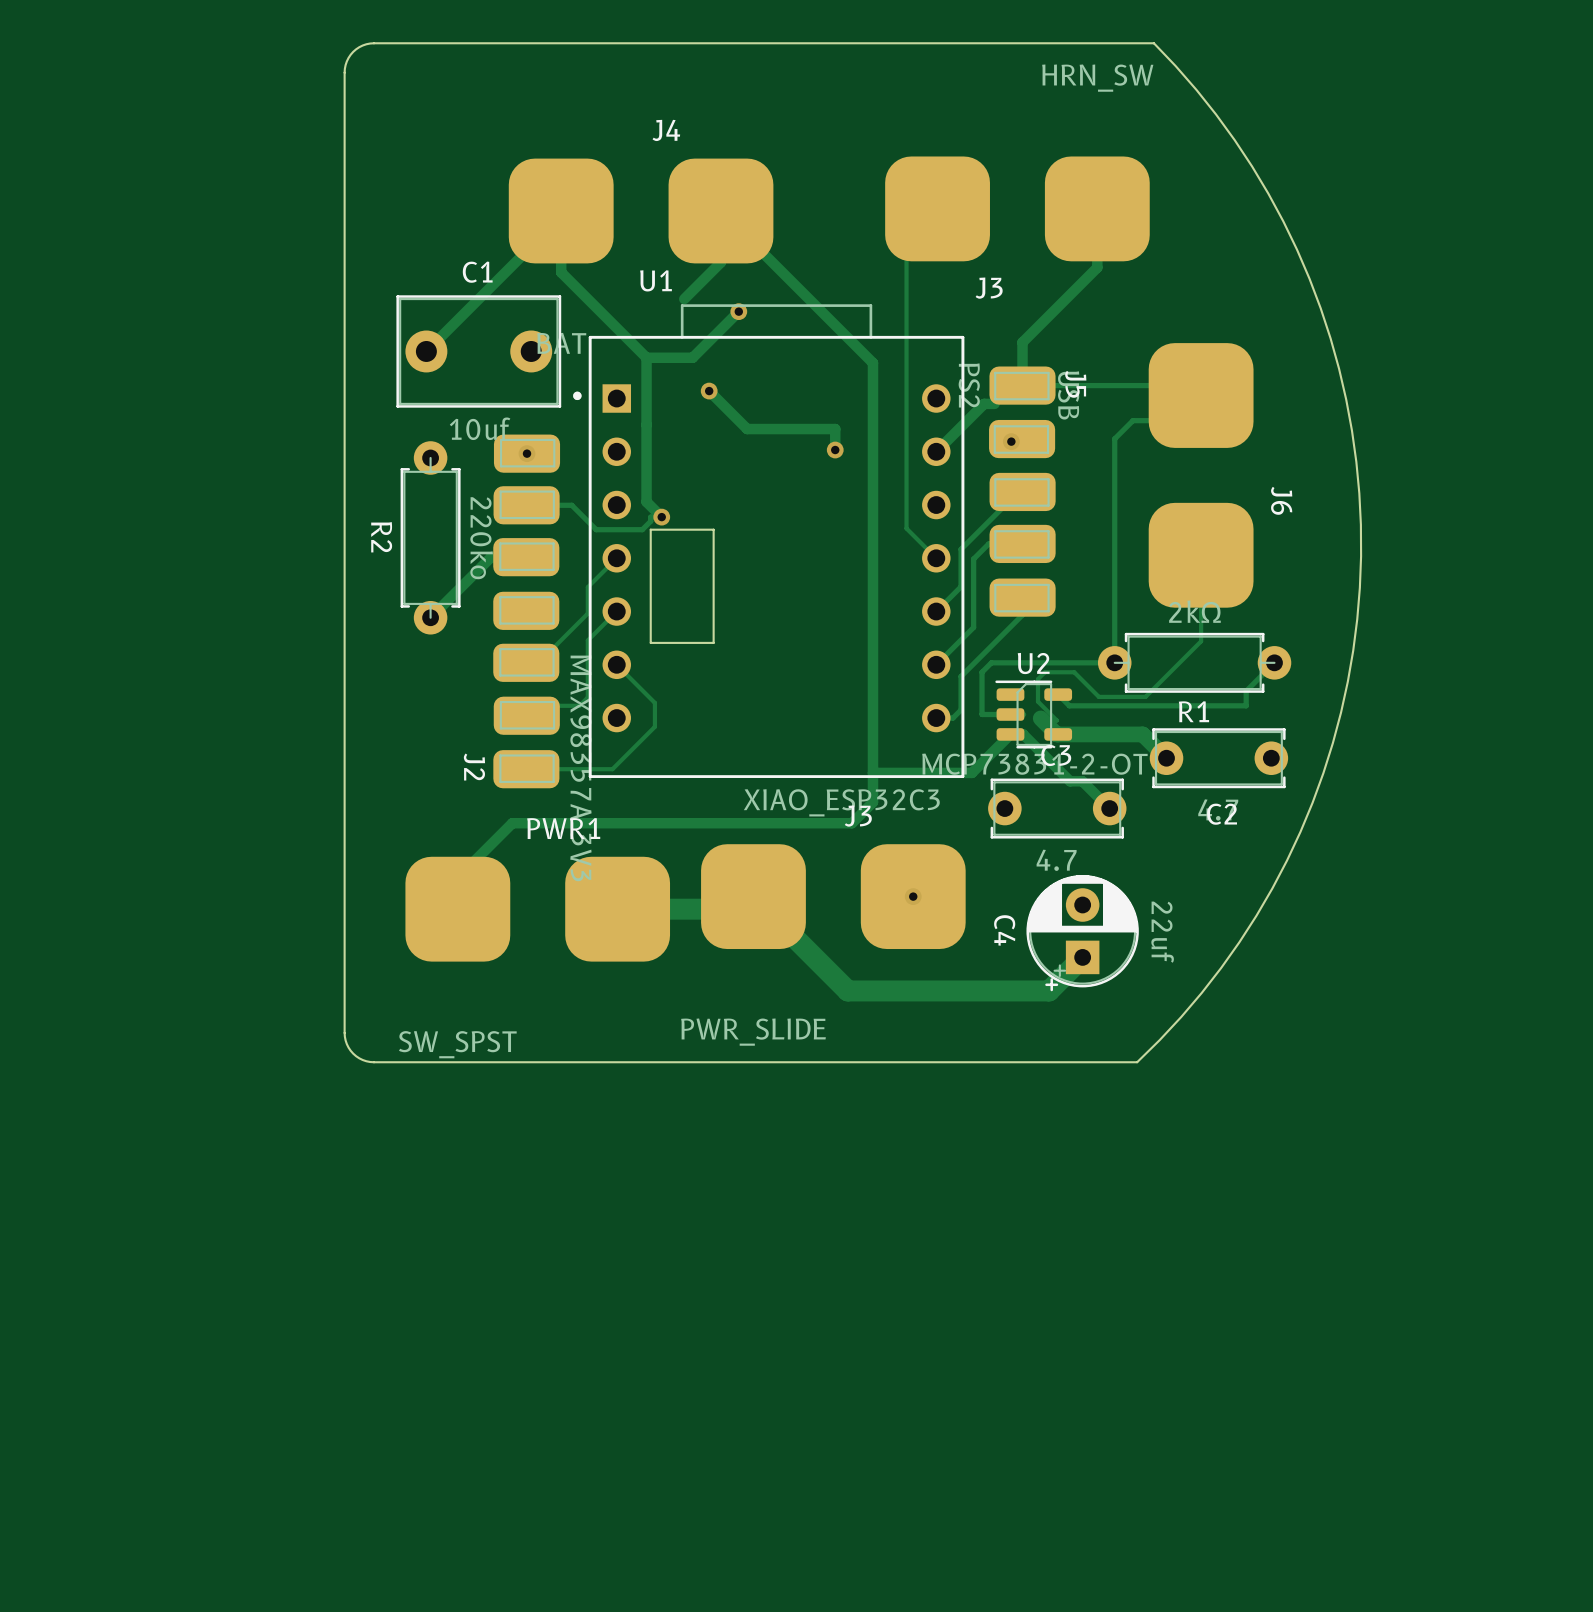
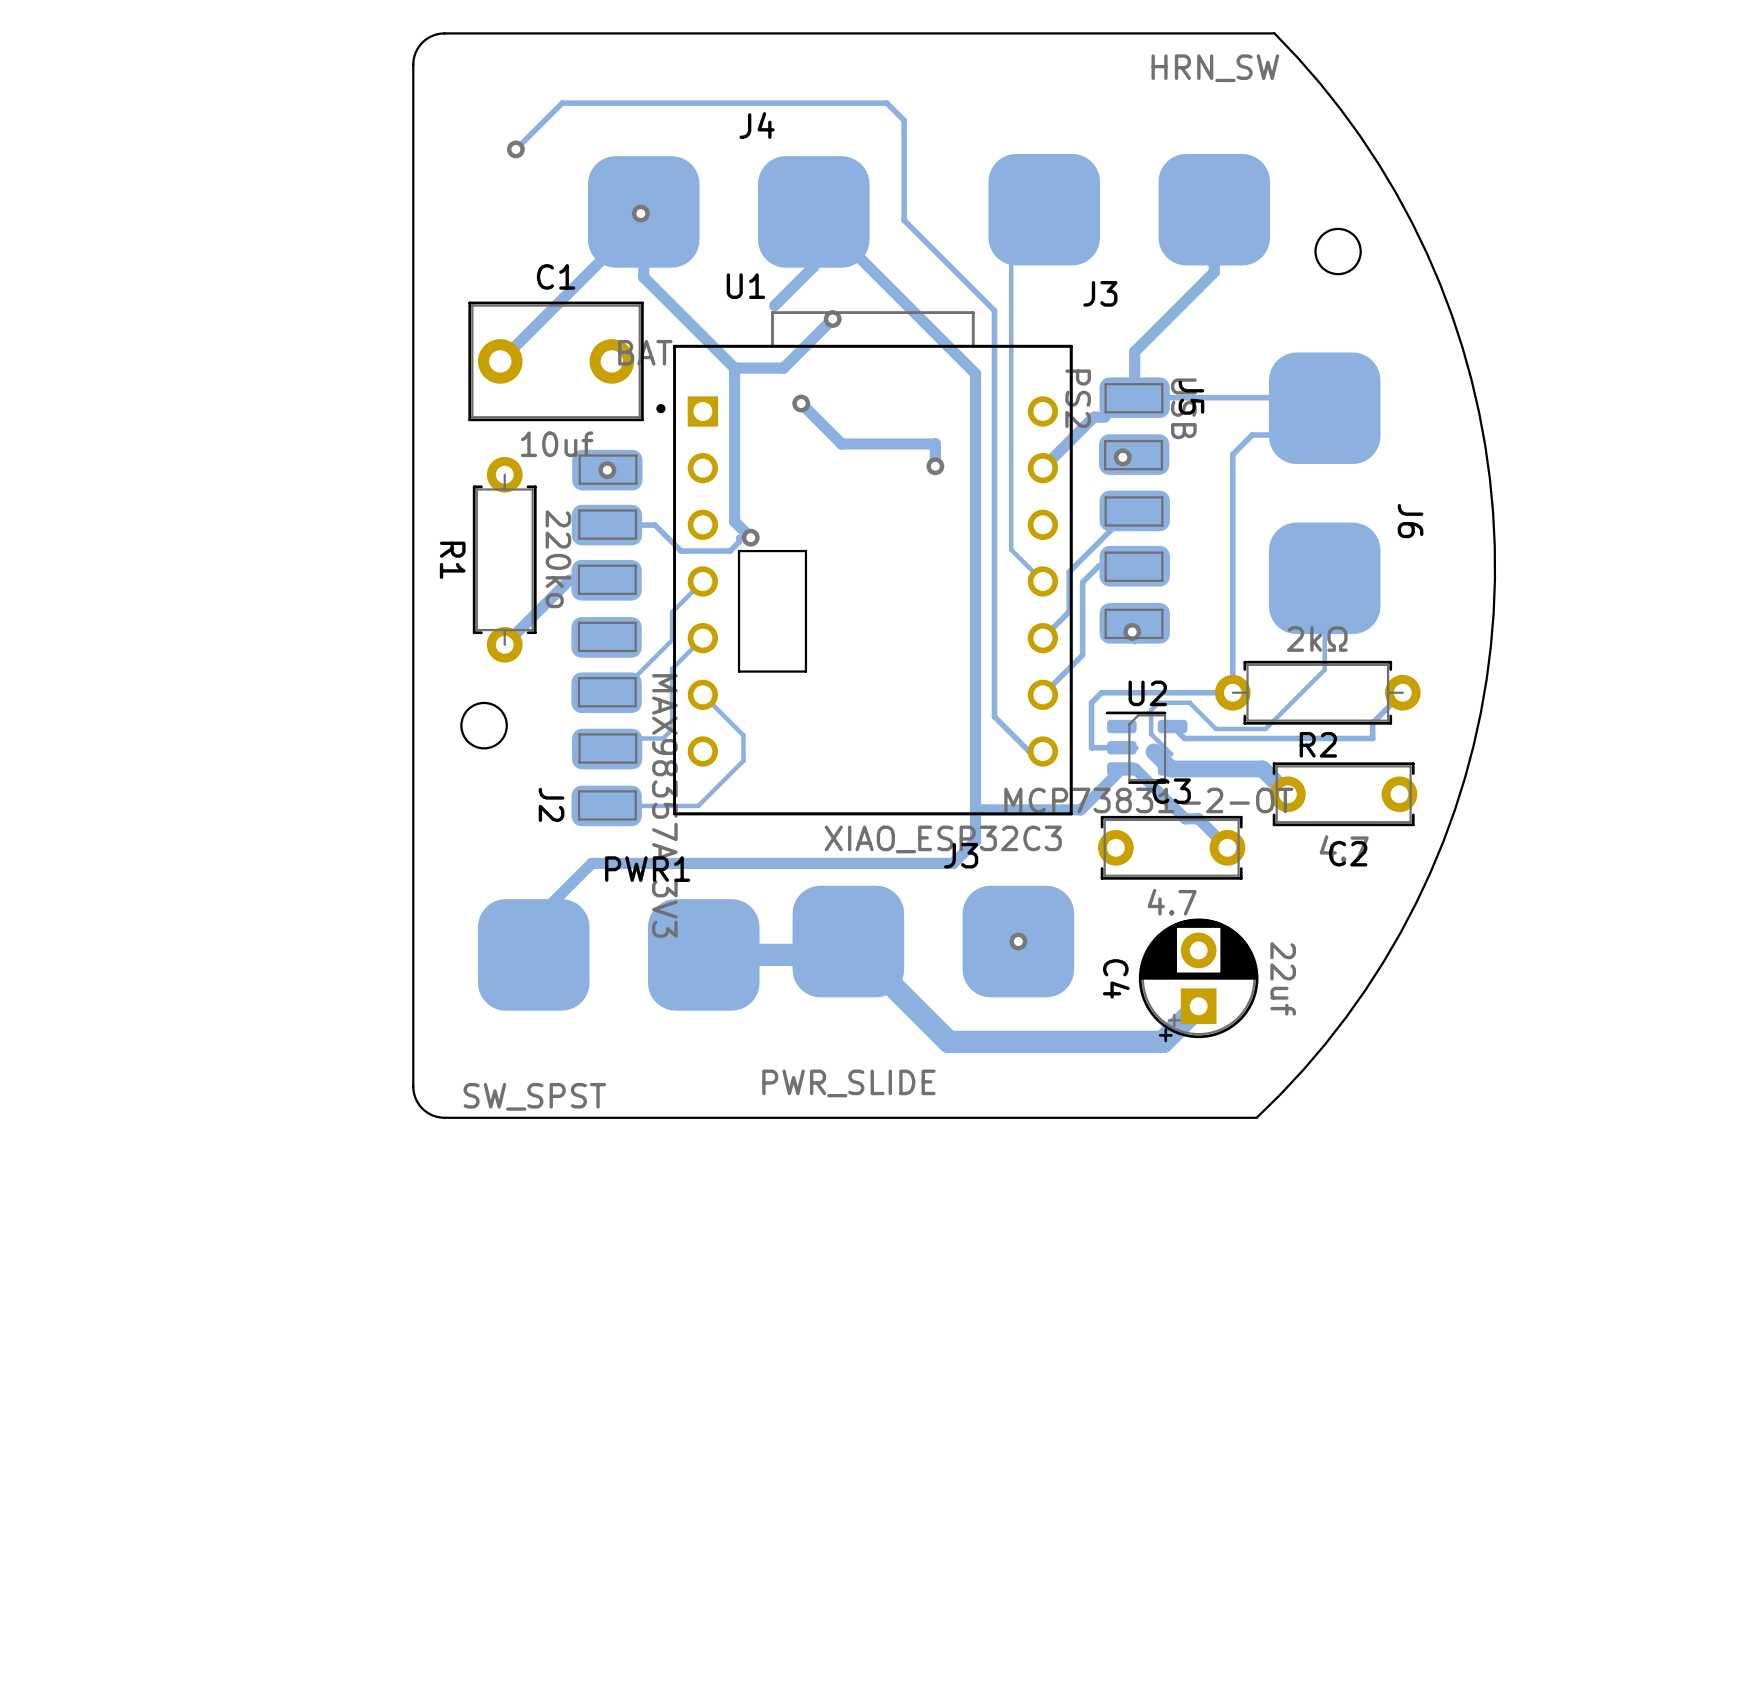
via: none -> (515, 149)
via: none -> (640, 213)
round board edge: none -> [1314, 227, 1362, 276]
R2 name: R2 (381, 537) -> R1 (452, 560)
via: none -> (1132, 631)
track: (1022, 614) (961, 676) (961, 710) (953, 718) (936, 718) -> (515, 149) (562, 103) (886, 103) (904, 120) (904, 220) (994, 310) (994, 716) (1029, 751) (1042, 751)
round board edge: none -> [460, 701, 508, 750]
R1 name: R1 (1193, 711) -> R2 (1318, 744)

